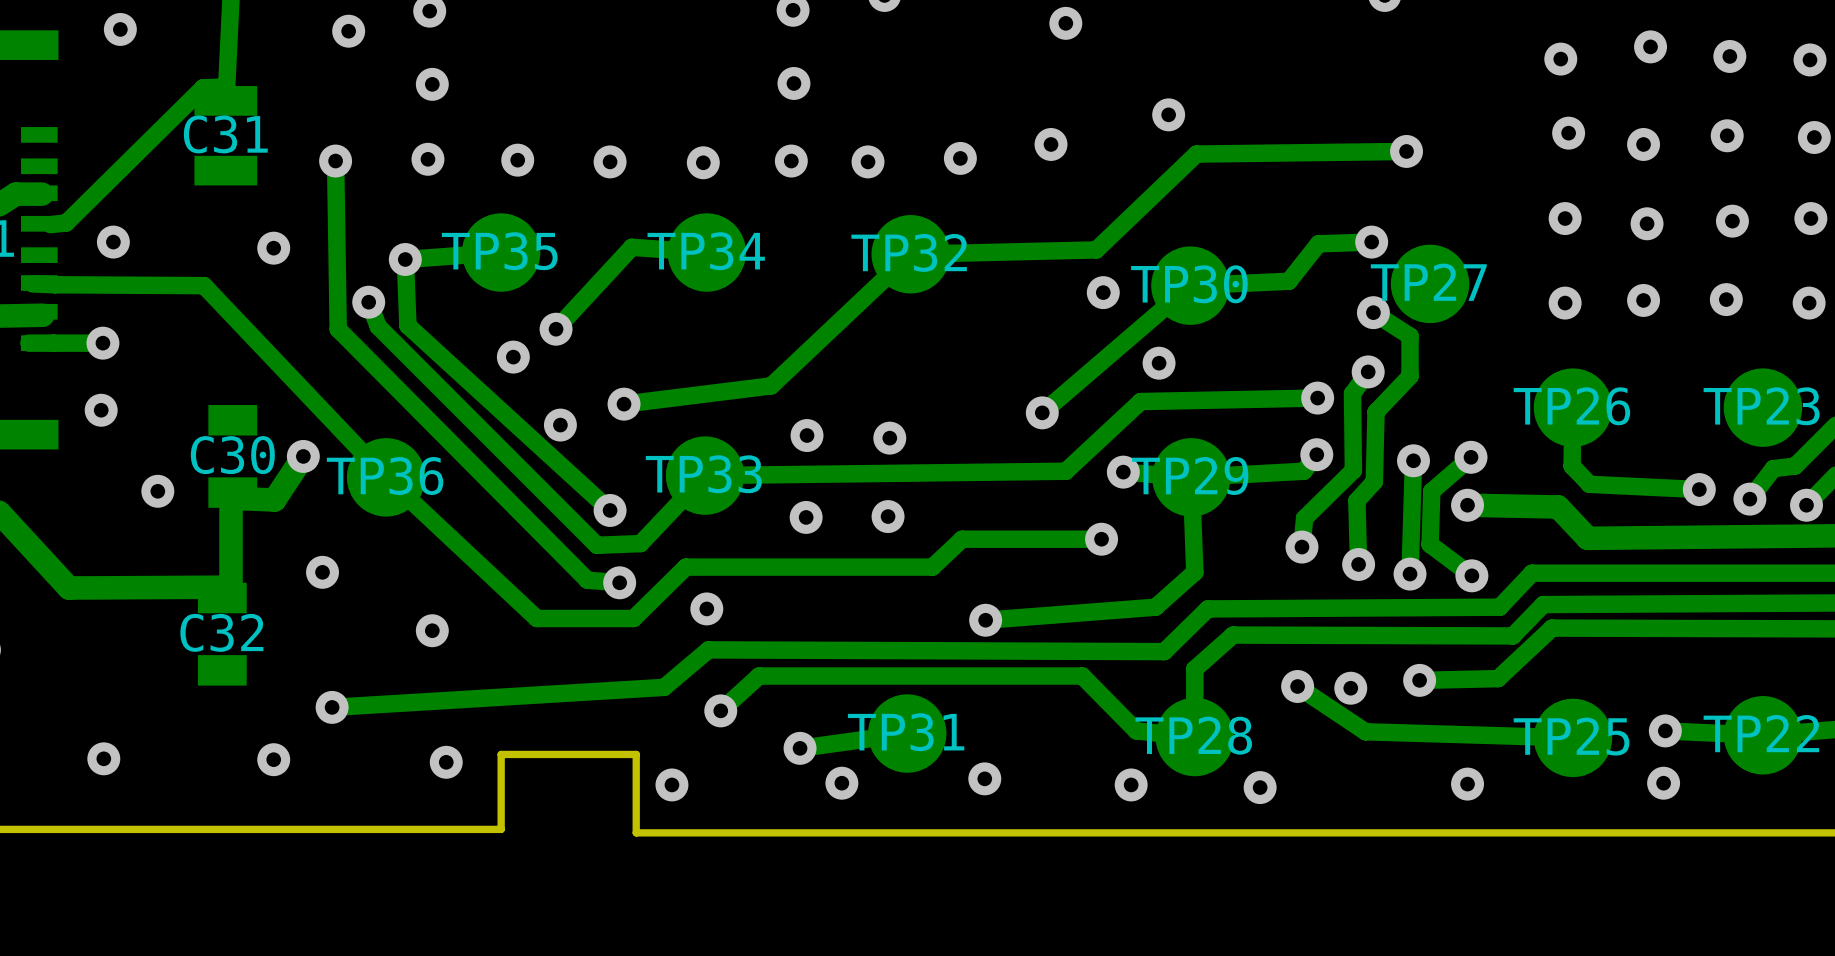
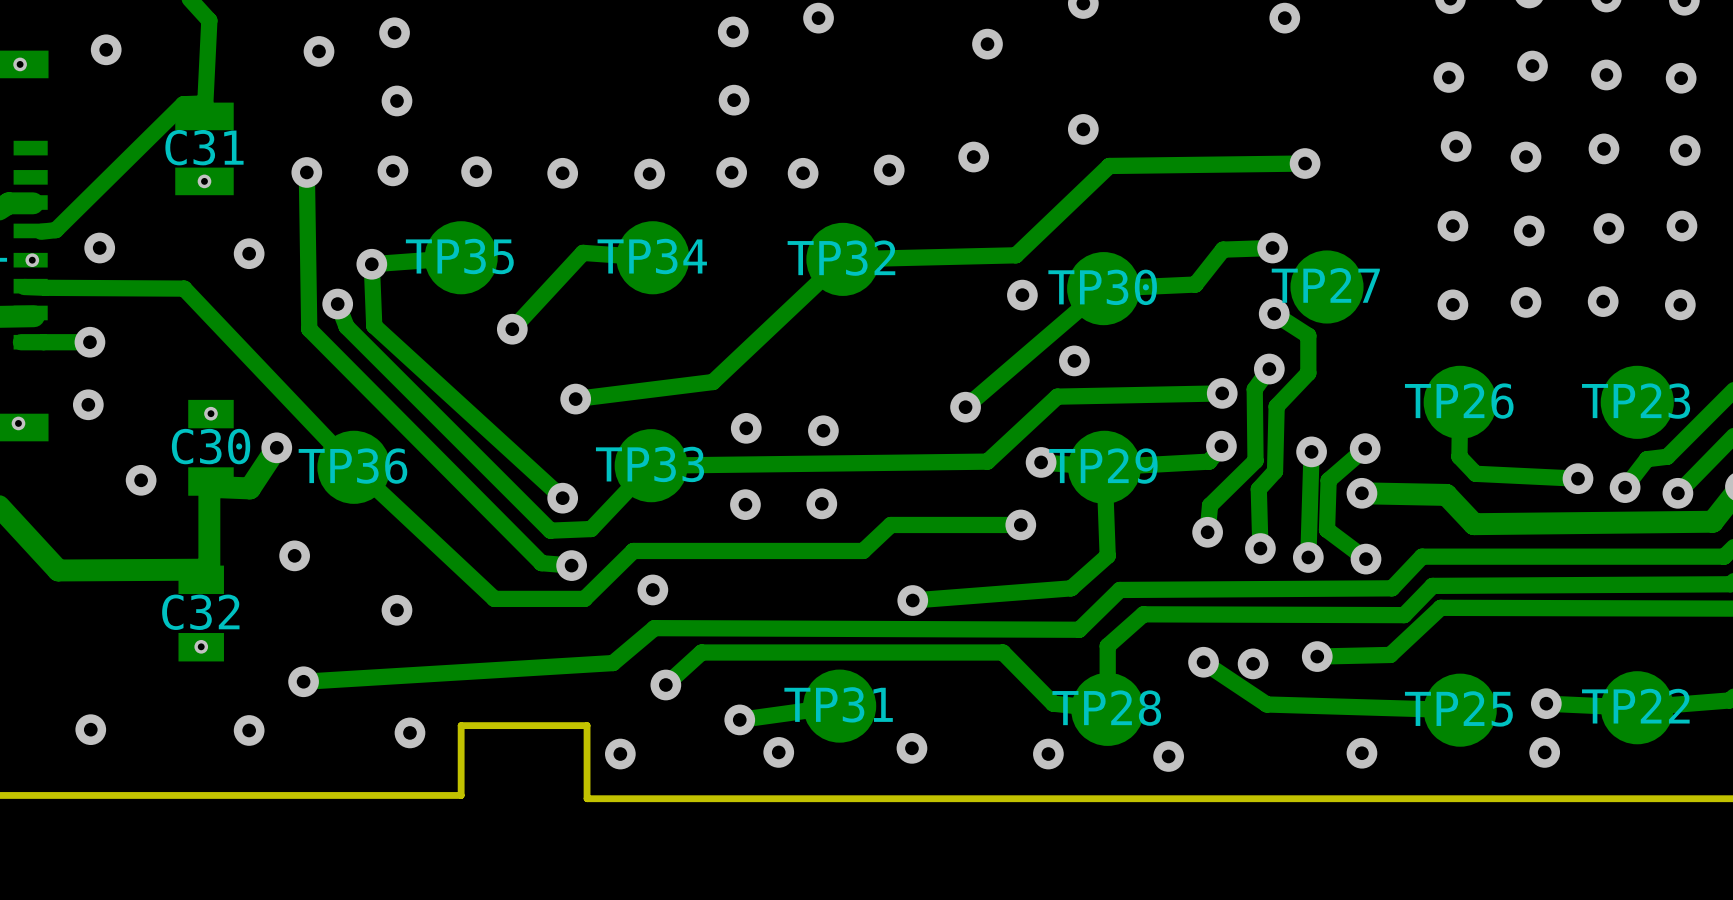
via: none -> (20, 64)
via: none -> (204, 181)
via: none -> (32, 260)
via: (513, 357) -> none
via: none -> (210, 413)
via: (560, 425) -> none
via: none -> (18, 423)
via: none -> (201, 646)

